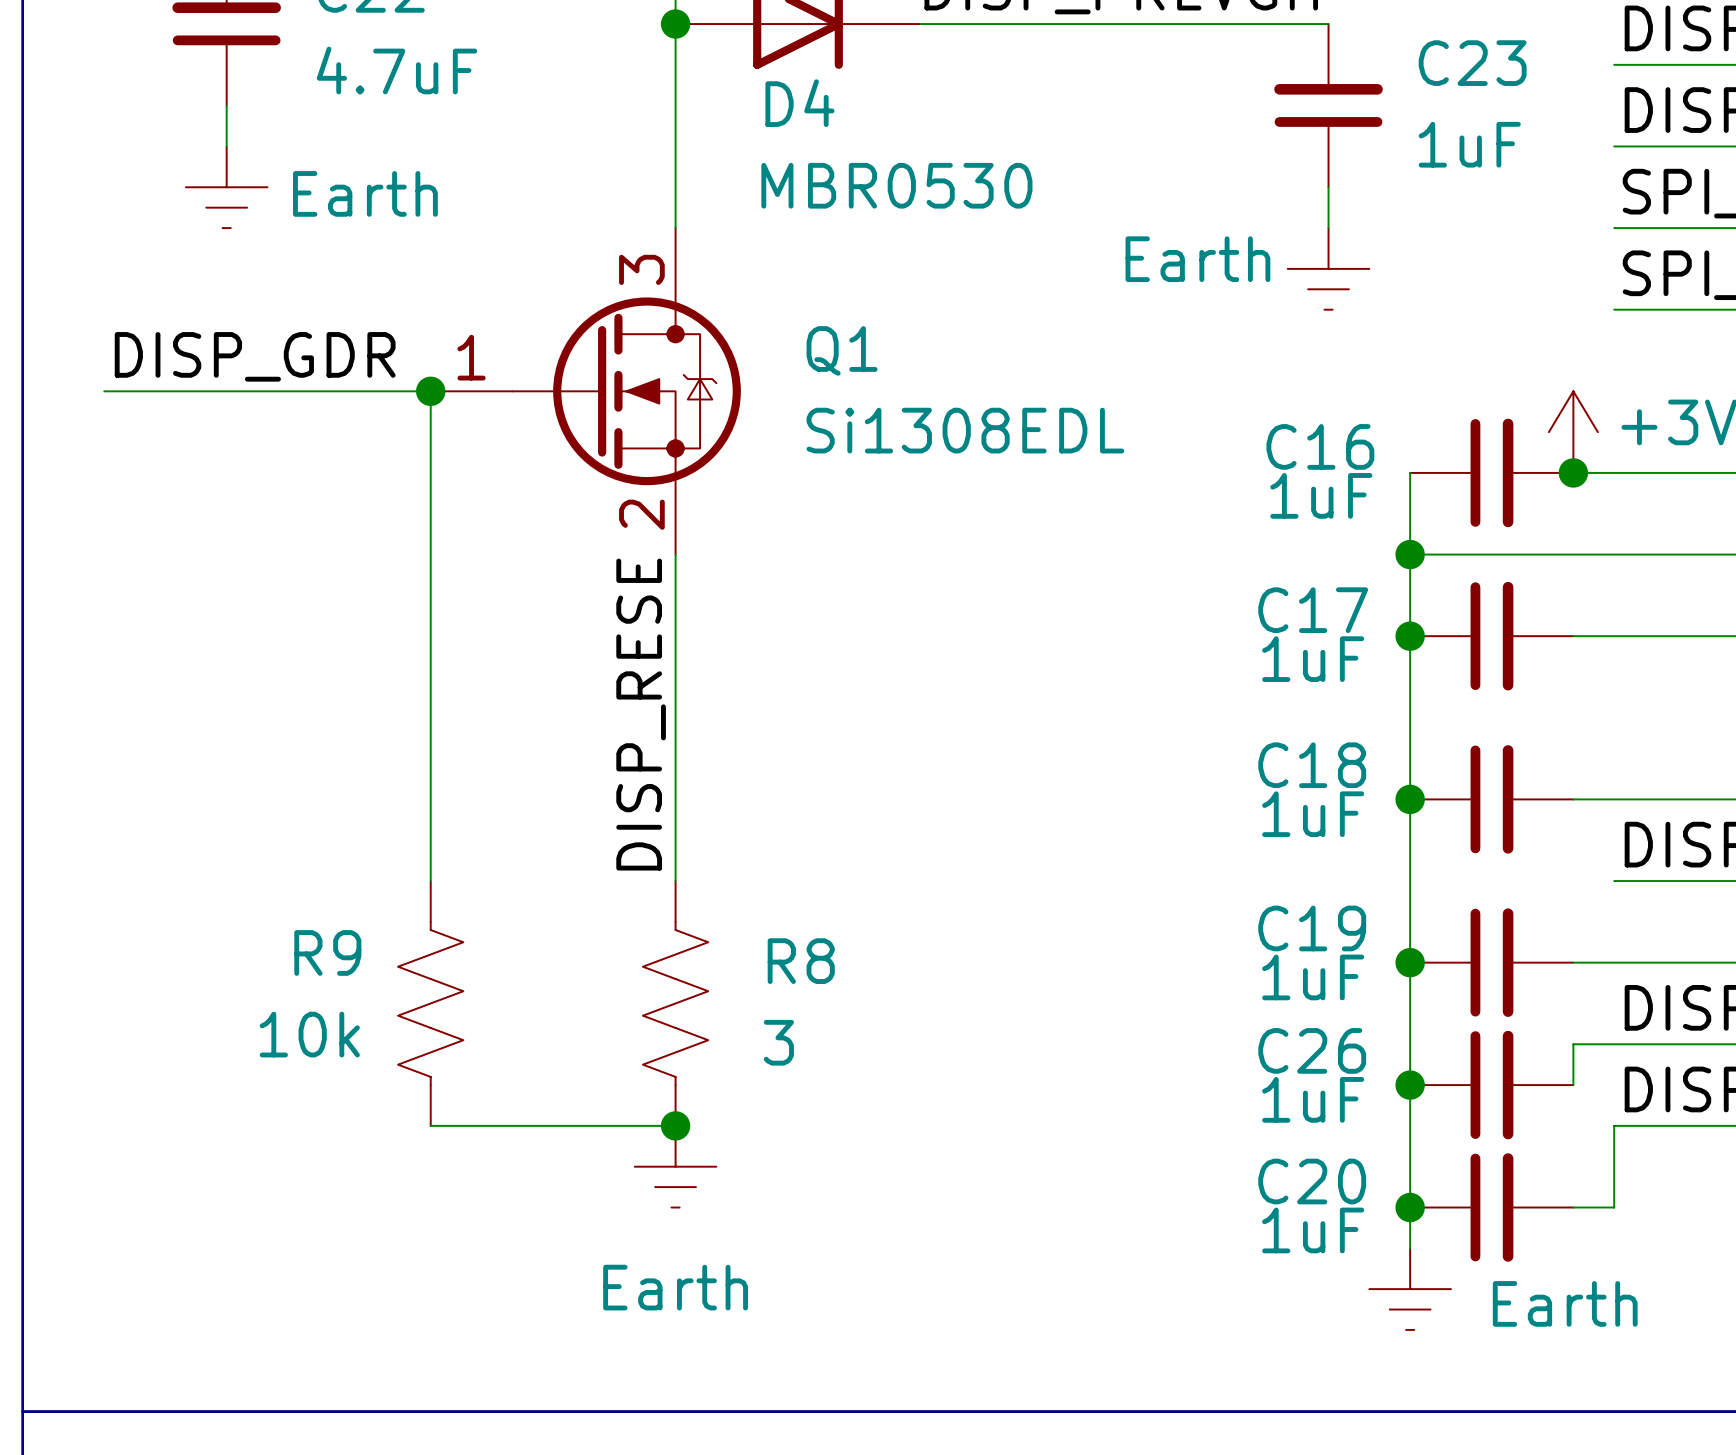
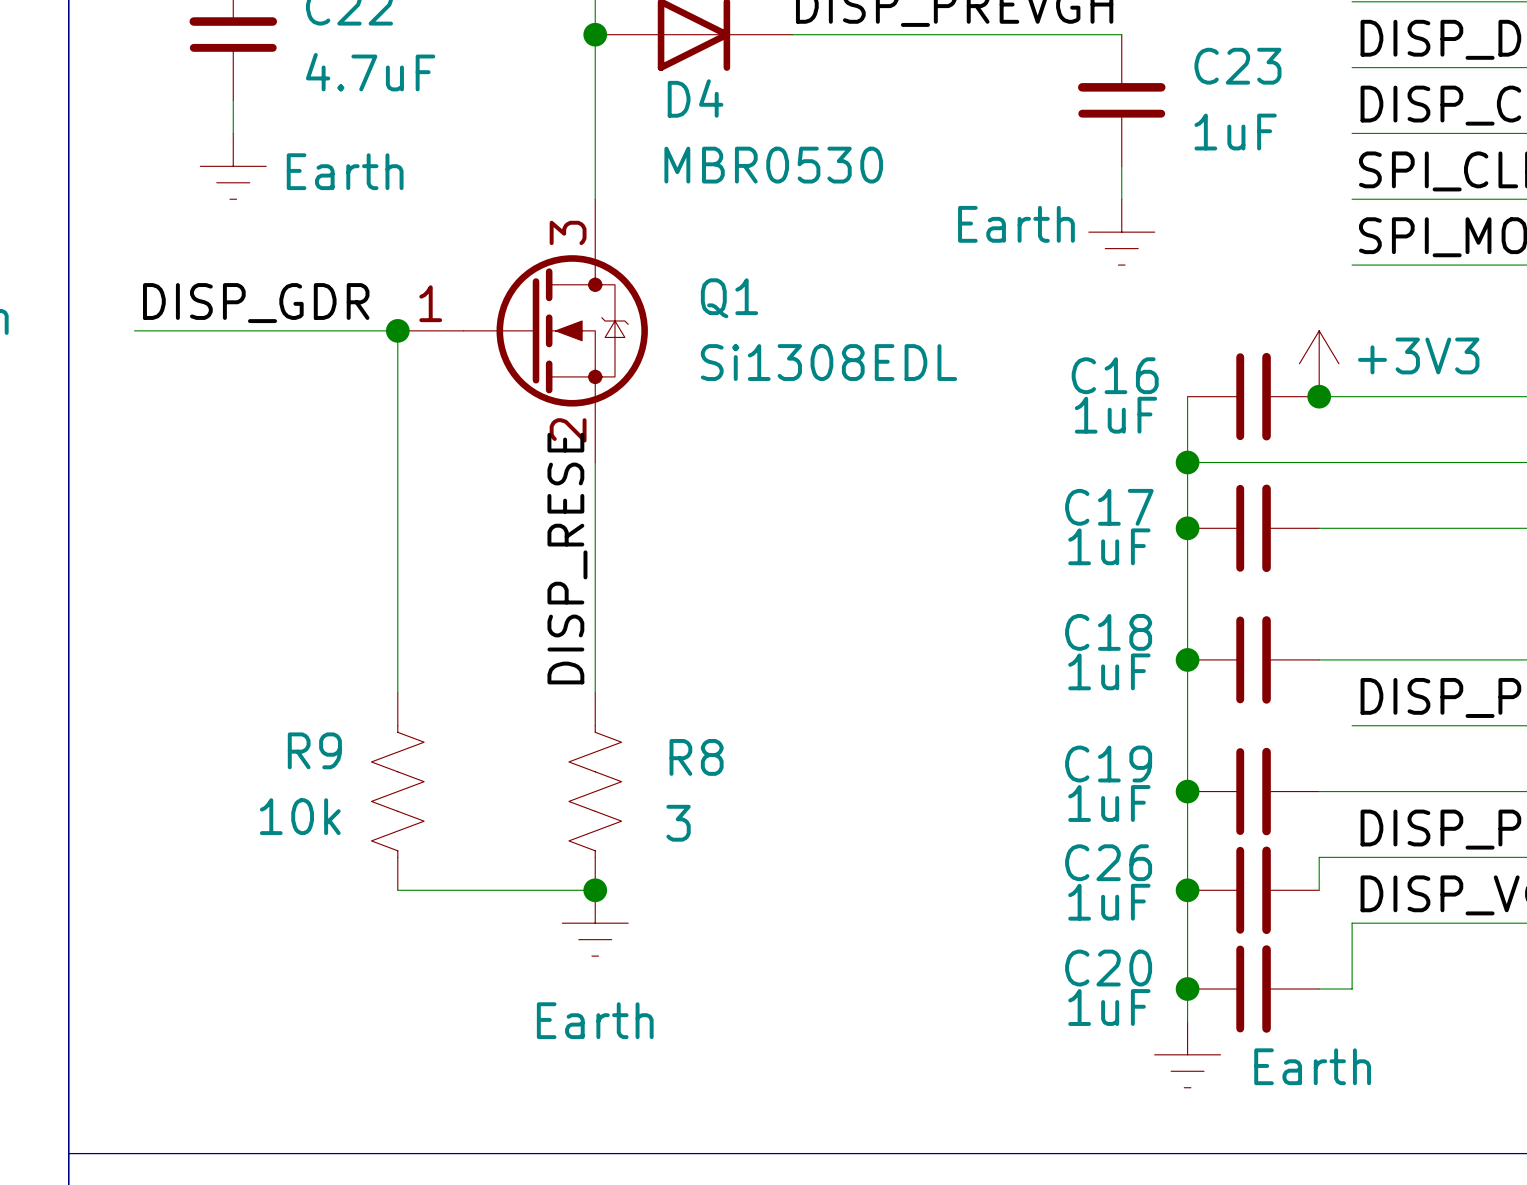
label position: DISP_RESE (641, 714) -> DISP_RESE (567, 558)
R9 position: (430, 1003) -> (397, 791)
R8 position: (675, 1003) -> (595, 791)
wire: (430, 1125) (675, 1125) -> (397, 890) (595, 890)
junction position: (675, 1125) -> (595, 890)
power symbol position: Earth (675, 1166) -> Earth (595, 923)

